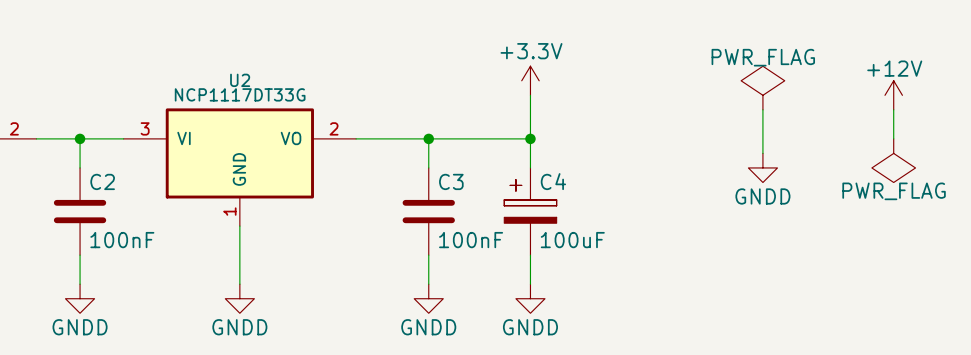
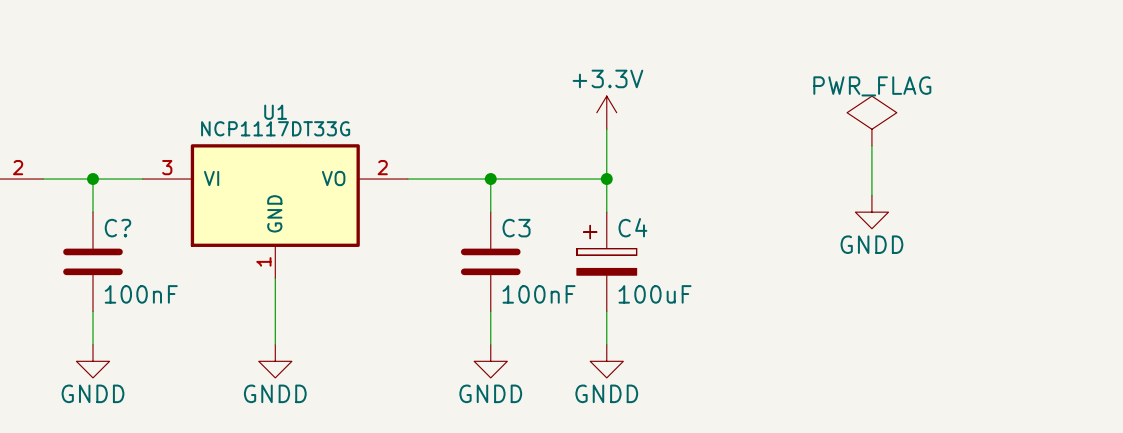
U2 name: U2 (240, 80) -> U1 (275, 112)
power symbol: +12V (893, 95) -> none
wire: (893, 109) (893, 138) -> none
power symbol: PWR_FLAG (893, 160) -> none
C2 name: C2 (102, 181) -> C? (117, 228)

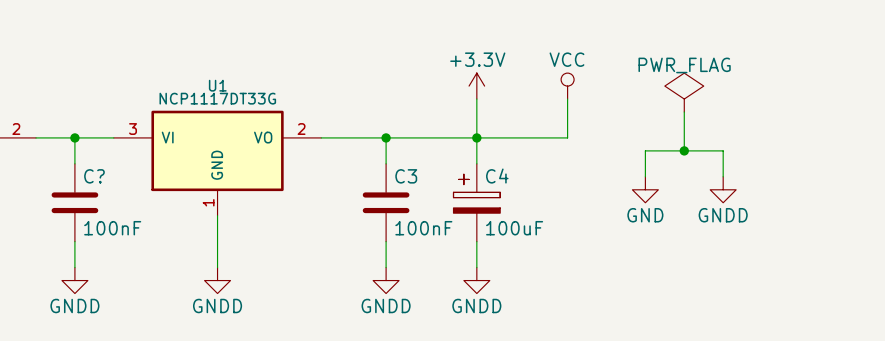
power symbol: none -> VCC (567, 86)
wire: none -> (567, 99) (567, 137) (476, 137)
junction: none -> (684, 150)
power symbol position: GNDD (871, 212) -> GNDD (723, 189)
wire: none -> (645, 176) (645, 150) (723, 150) (723, 176)
power symbol: none -> GND (645, 189)

